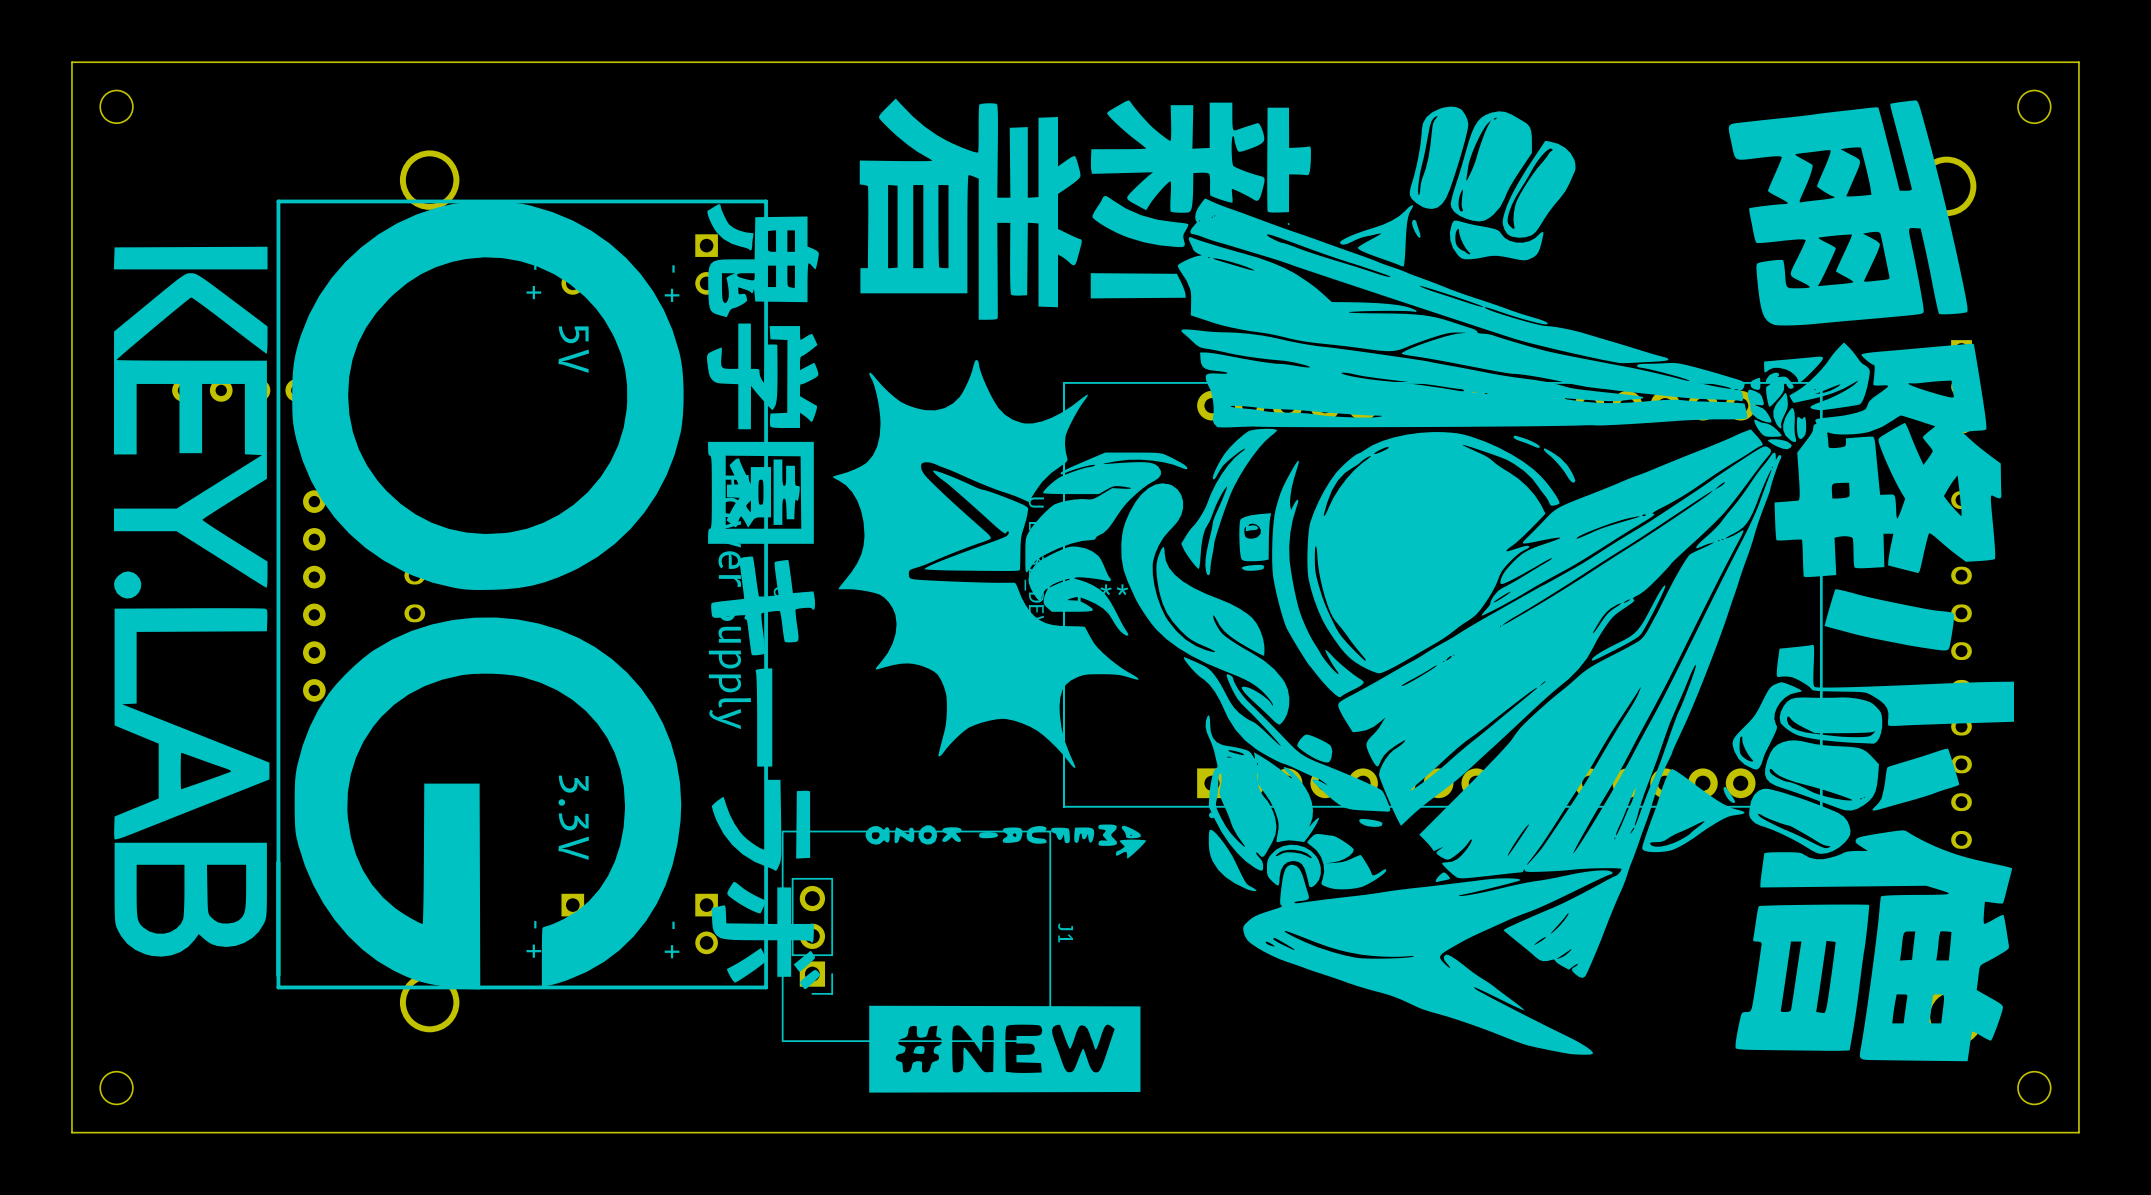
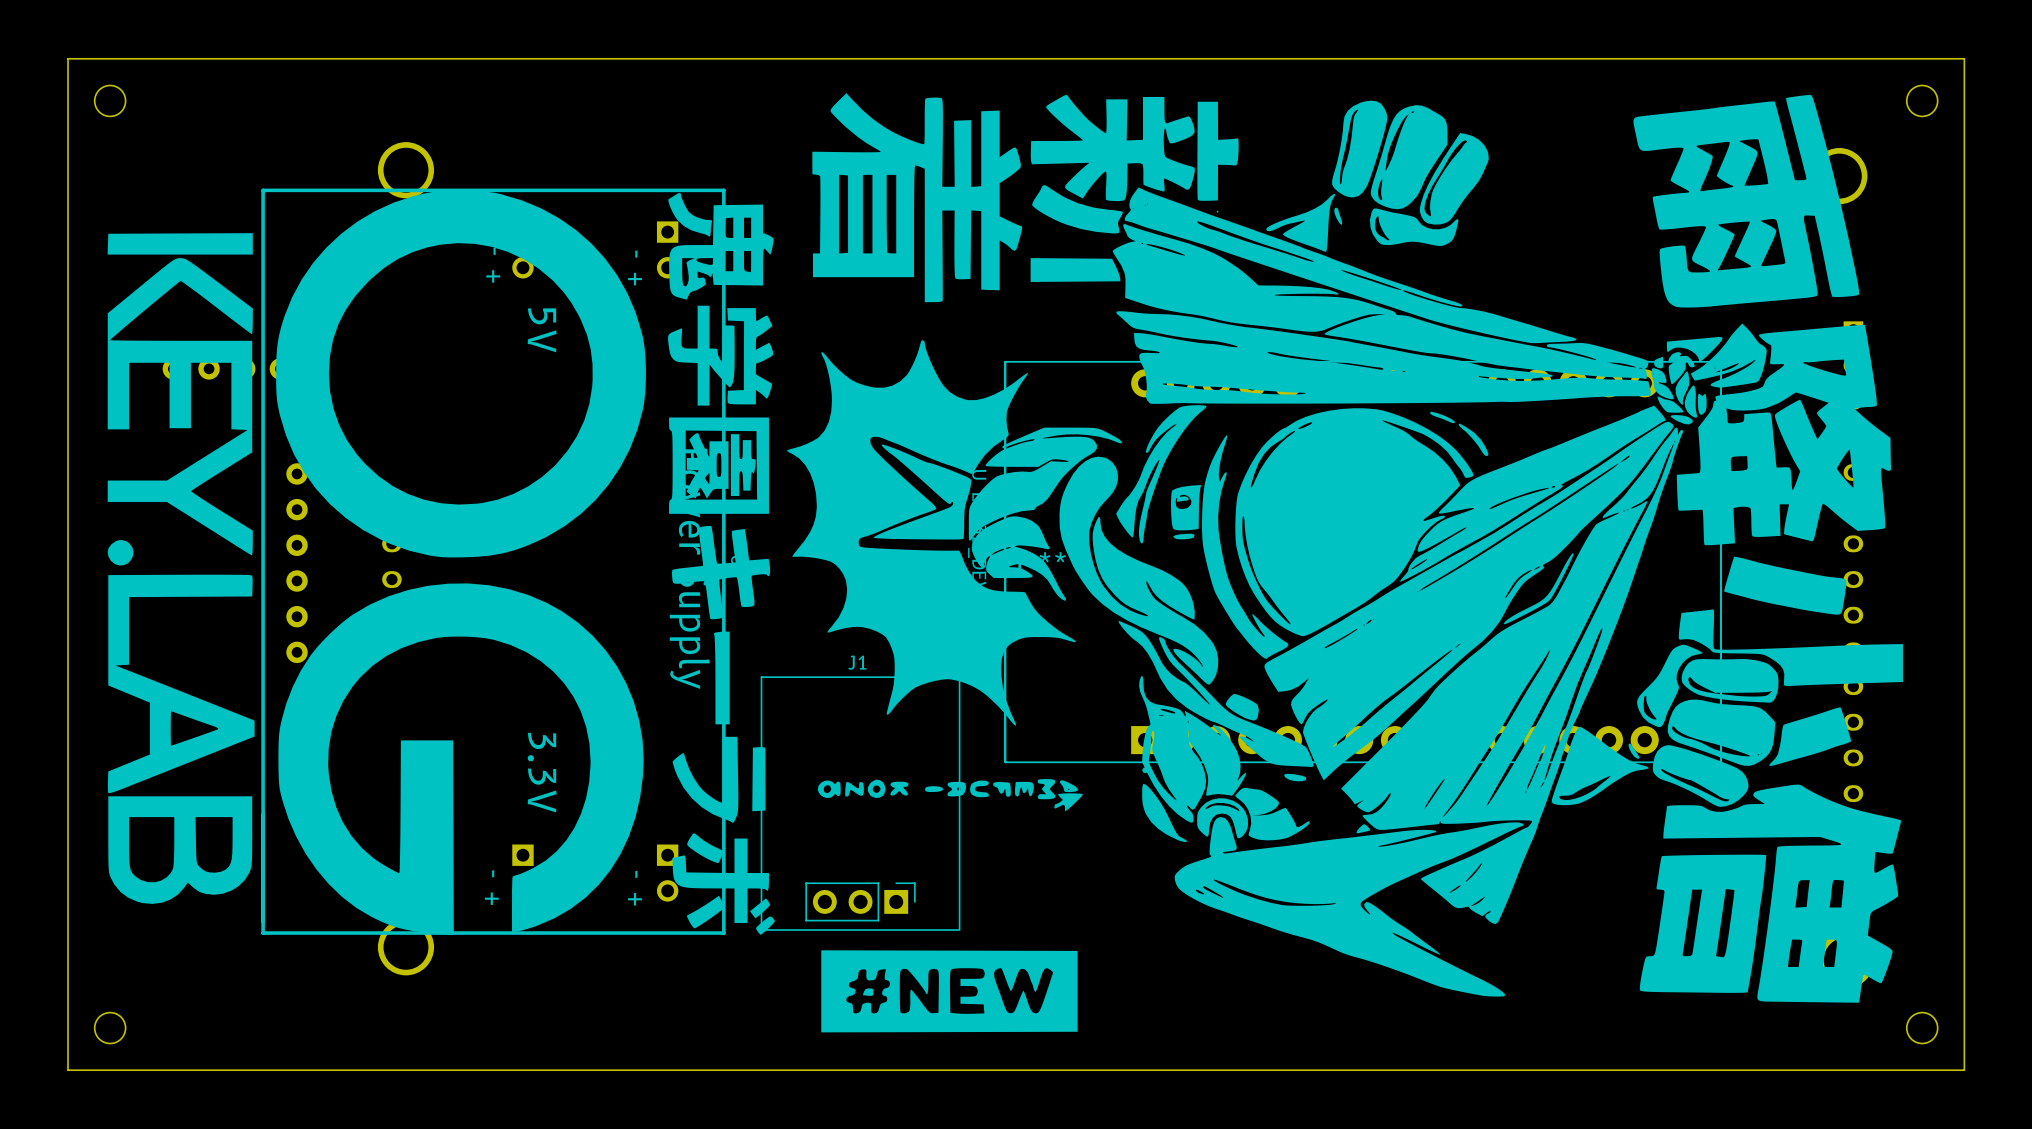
part: (522, 594) -> none
part: none -> (493, 561)
J1 rotation: 0° (916, 936) -> 90° counterclockwise (860, 803)

